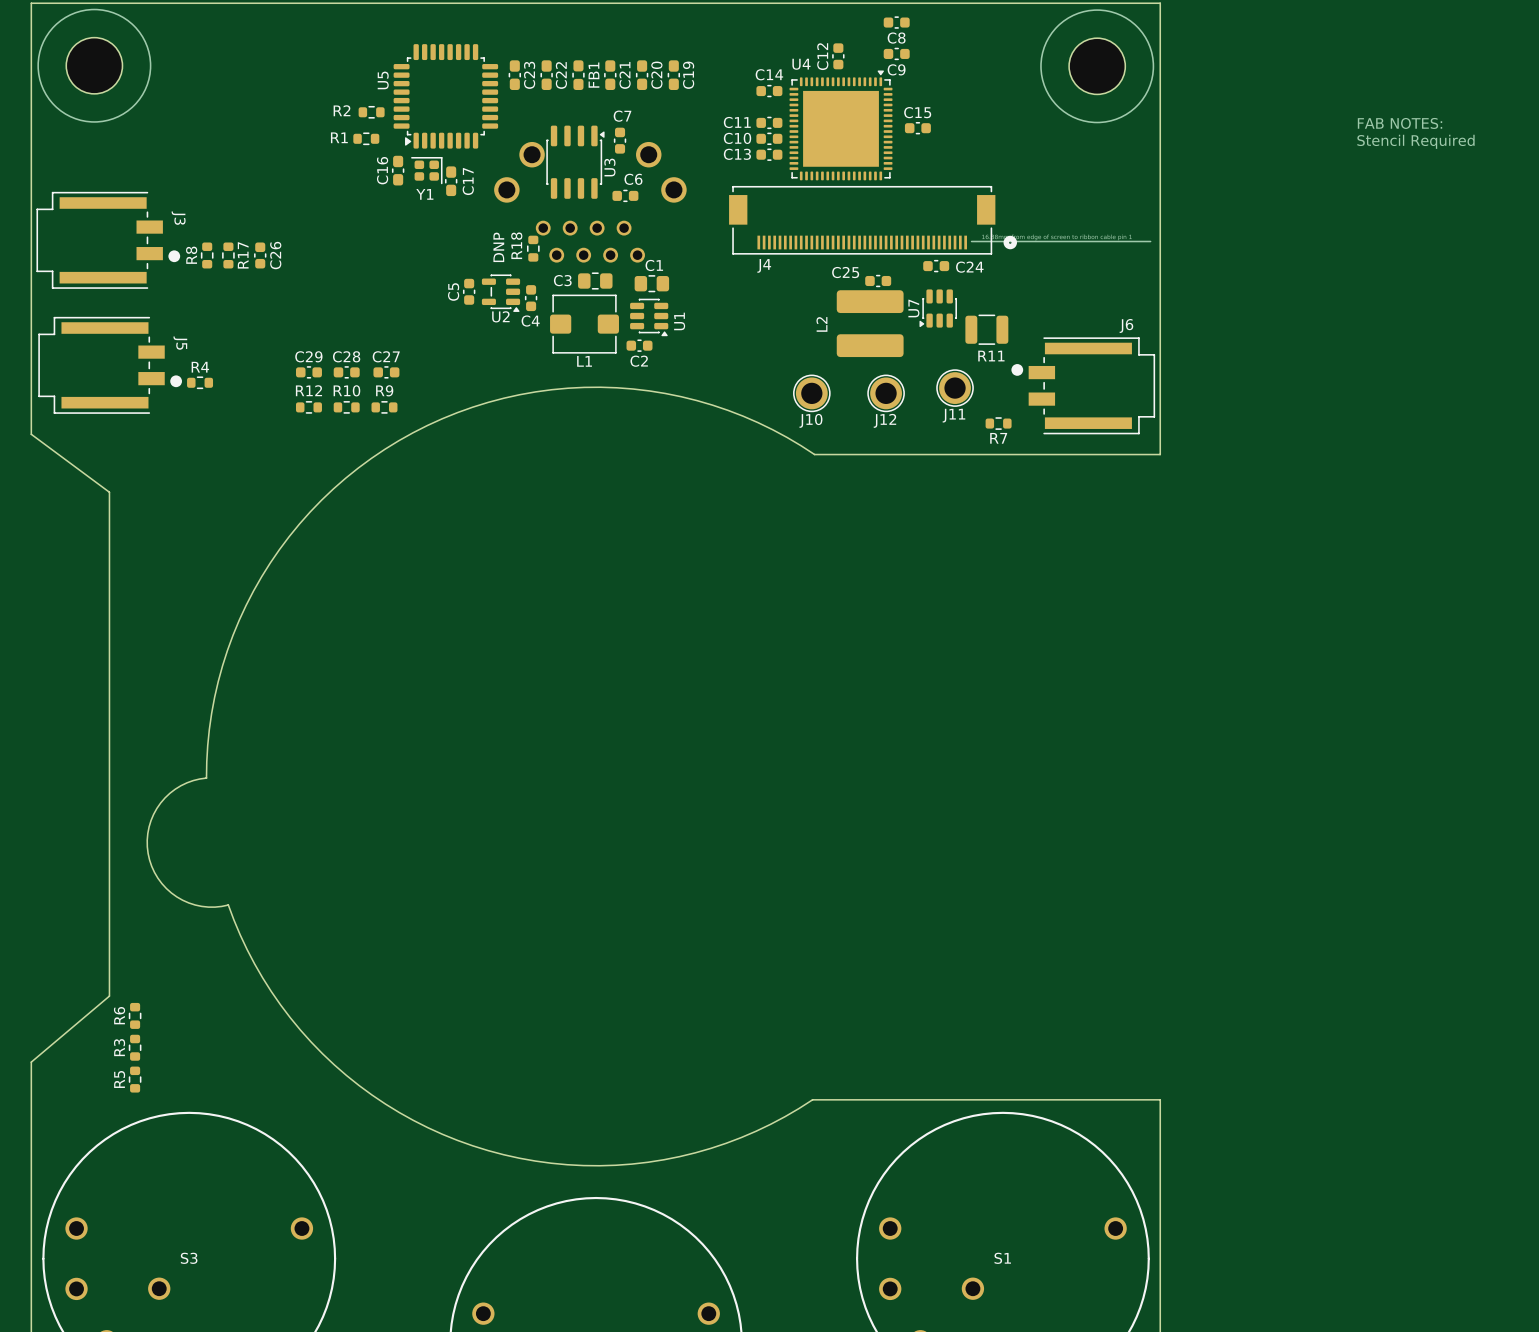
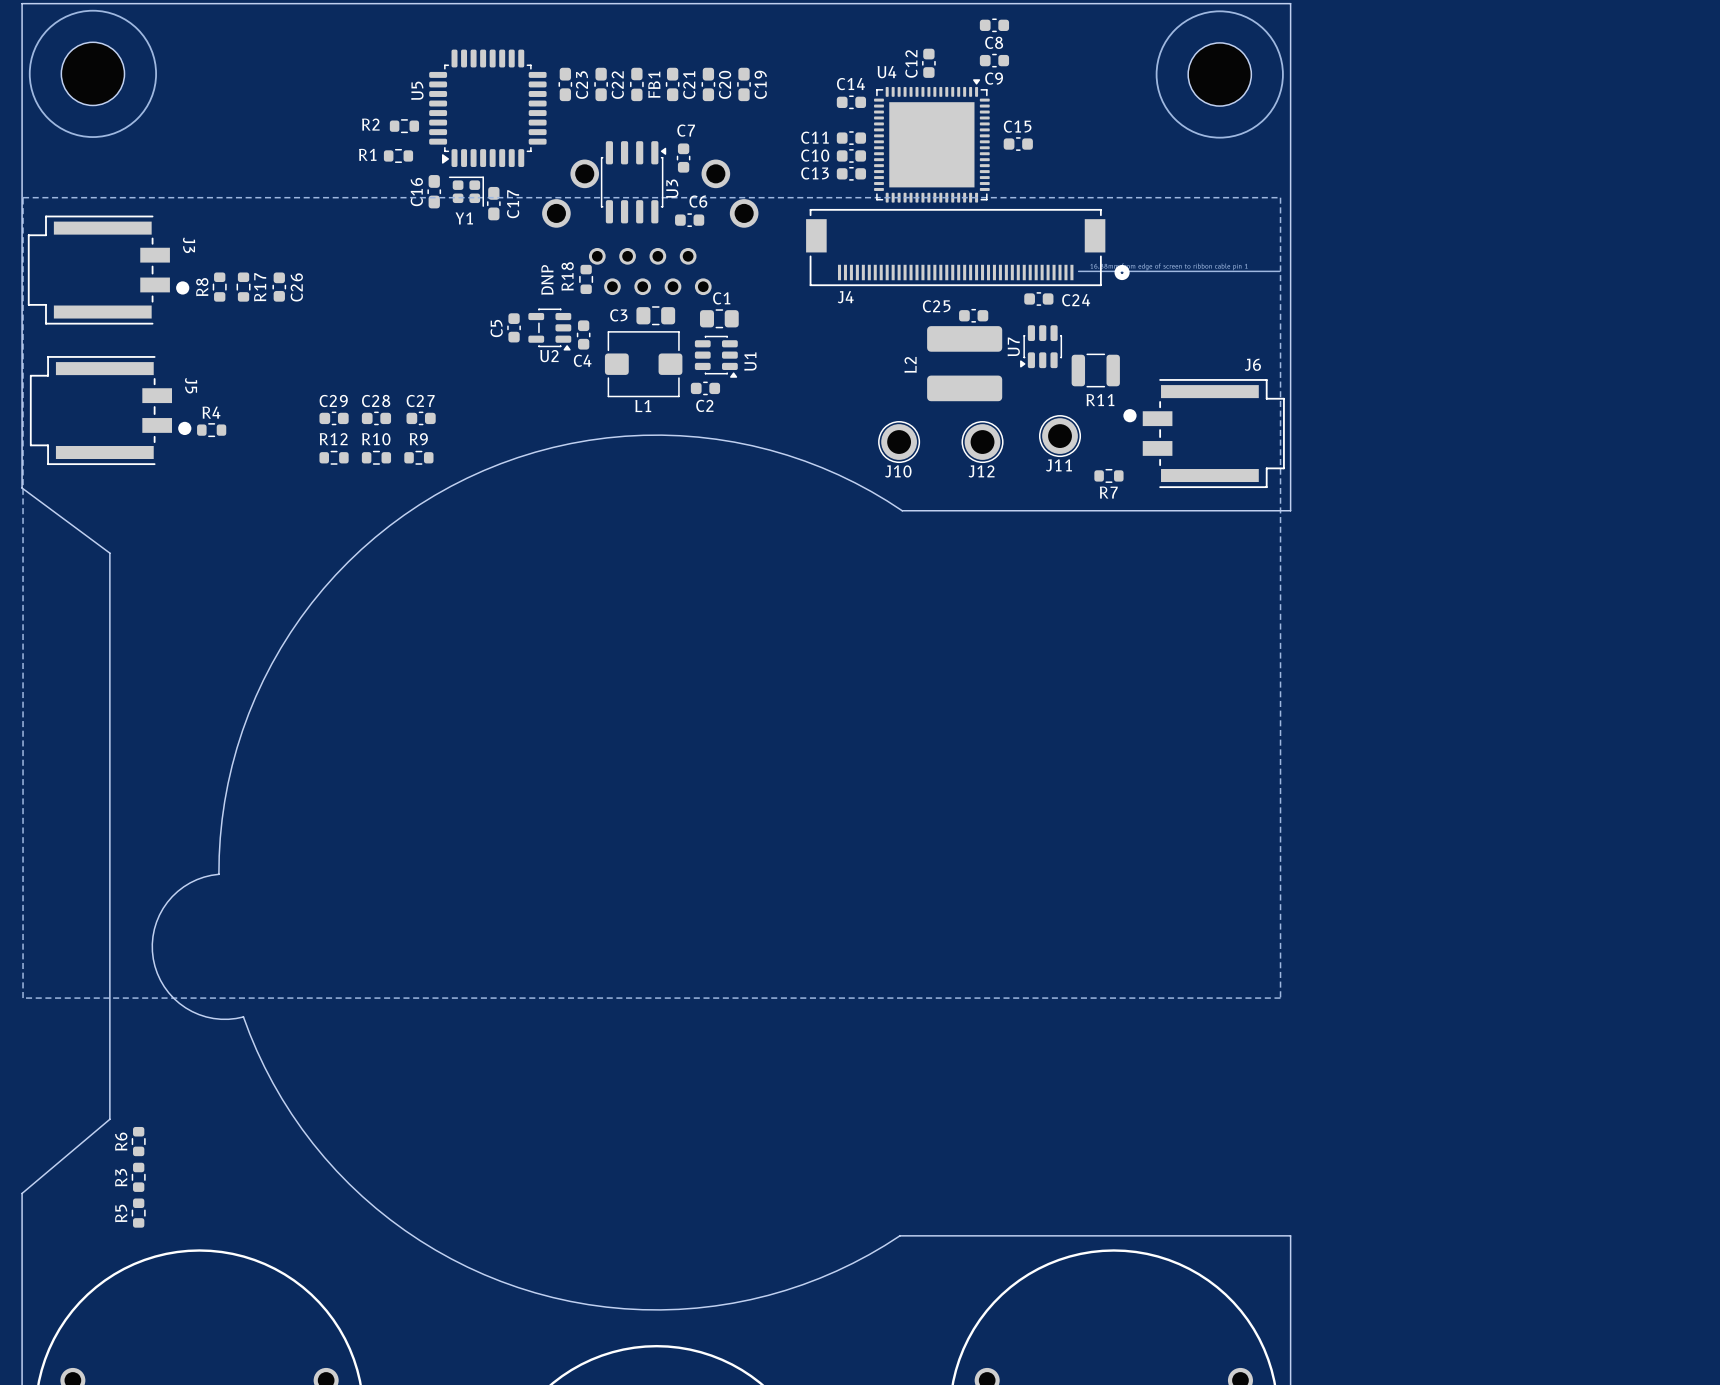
text: FAB NOTES: (1400, 123) -> none
text: Stencil Required (1415, 141) -> none
line: none -> (23, 197) (1280, 197) (1280, 998) (23, 998) (23, 197)

